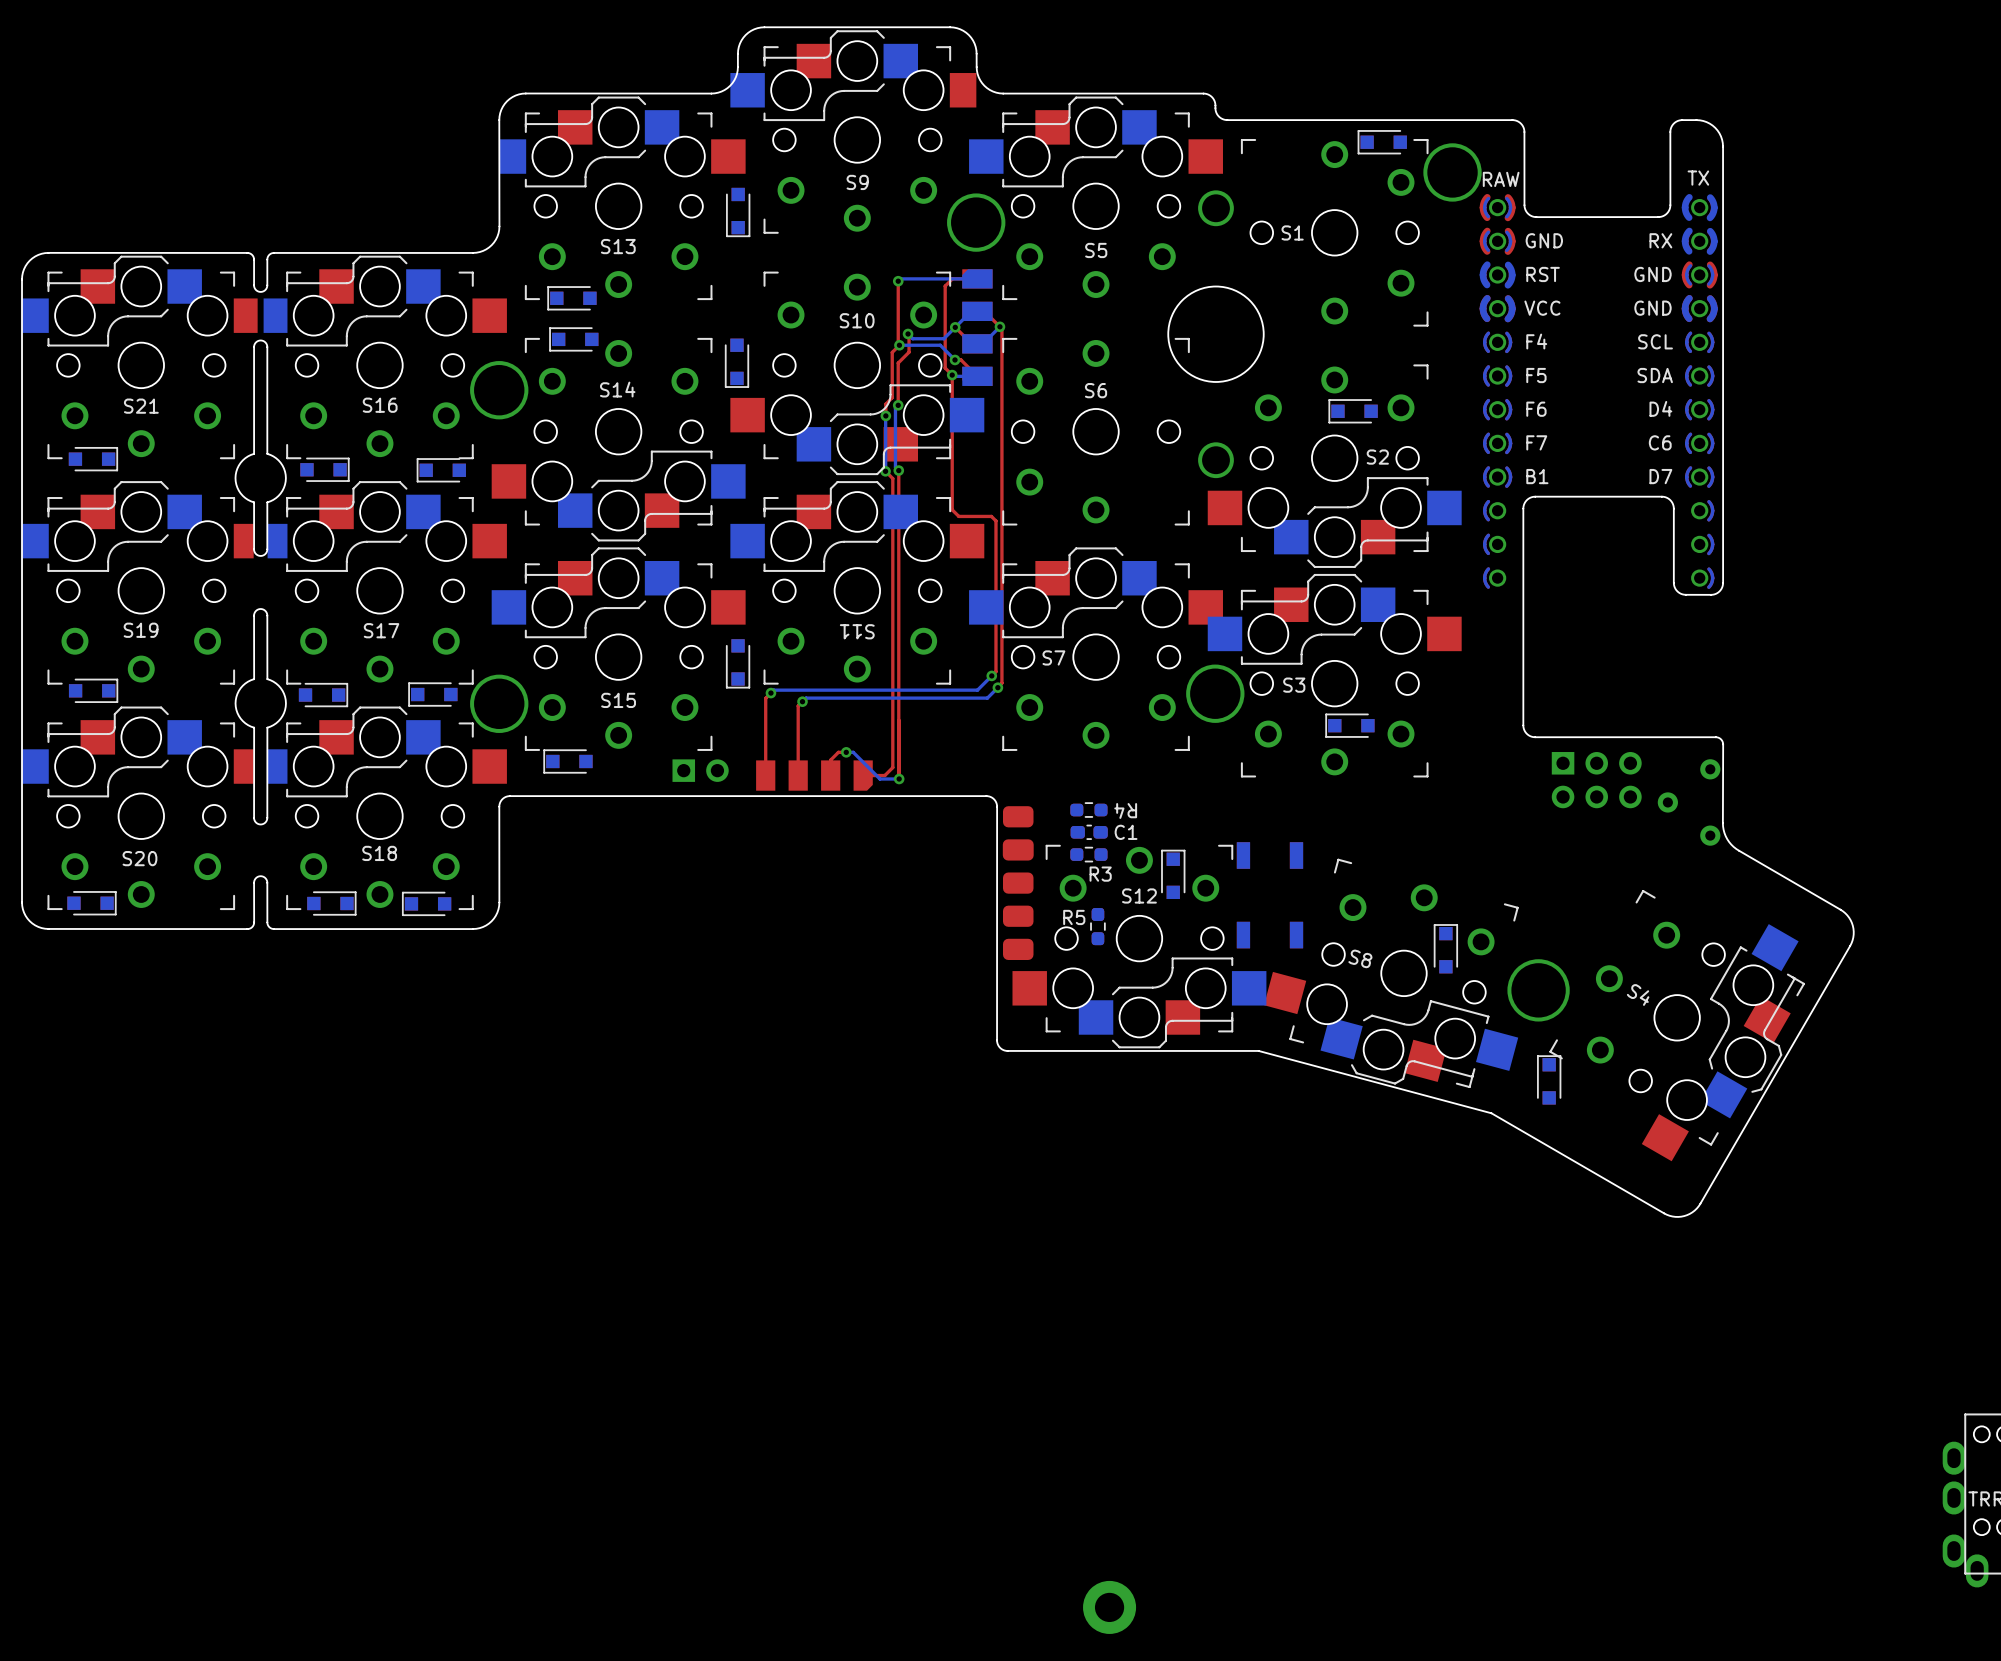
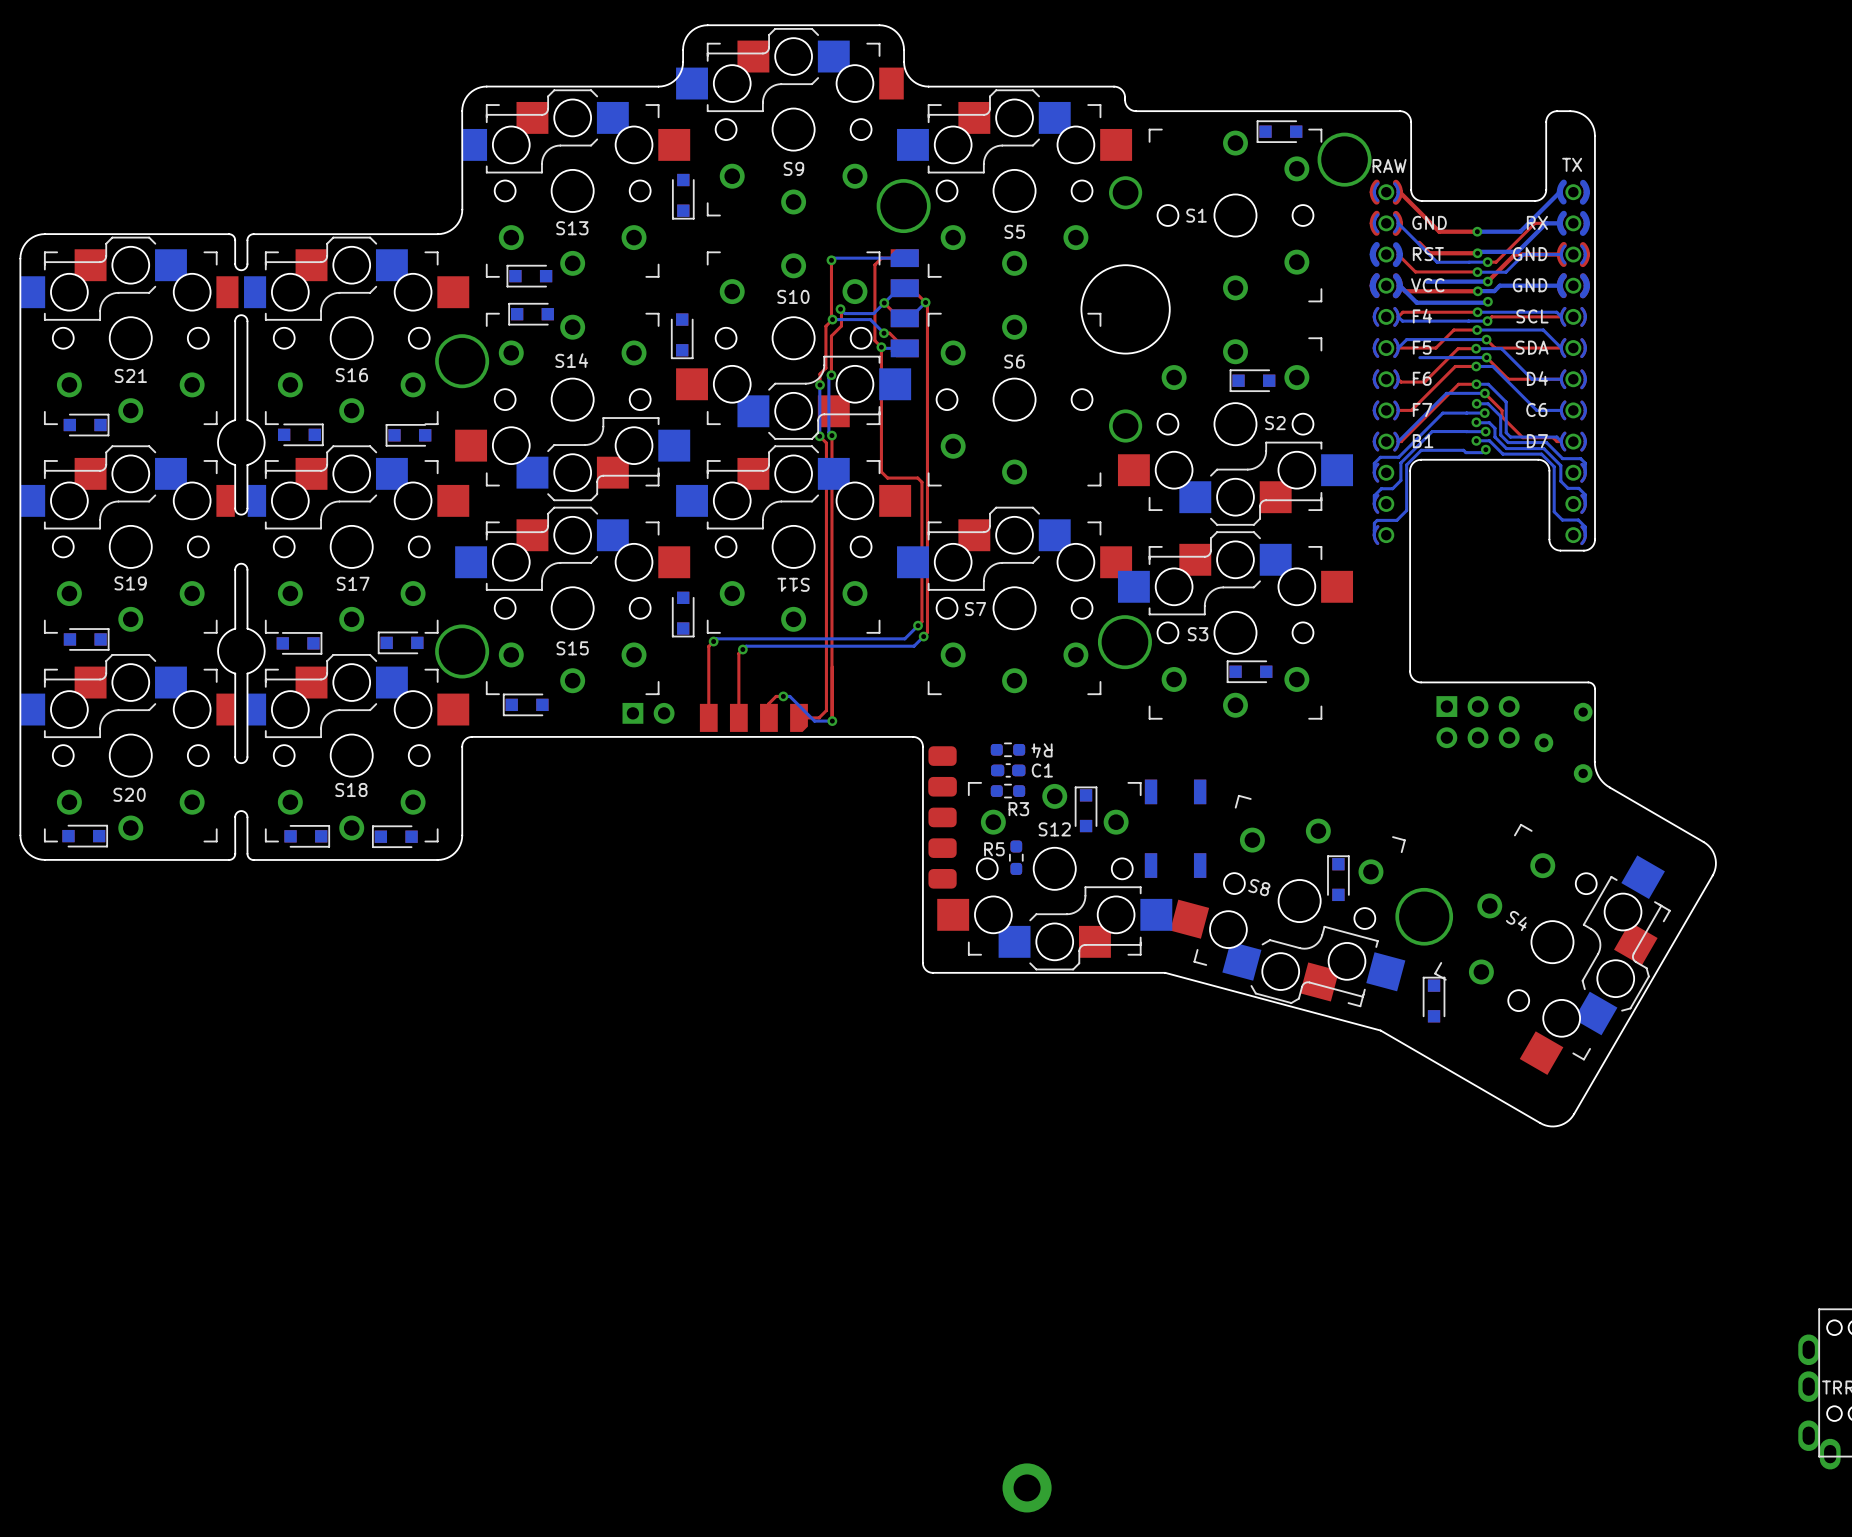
top track: none -> (1399, 192) (1439, 231) (1477, 231)
bottom track: none -> (1559, 192) (1520, 231) (1477, 231)
bottom track: none -> (1398, 223) (1437, 262) (1469, 262)
bottom track: none -> (1559, 223) (1546, 223) (1517, 251) (1477, 253)
top track: none -> (1561, 223) (1534, 223) (1496, 262) (1487, 262)
via: none -> (1477, 231)
top track: none -> (1419, 242) (1429, 253) (1477, 253)
via: none -> (1477, 253)
top track: none -> (1559, 254) (1514, 254) (1487, 281)
bottom track: none -> (1561, 254) (1523, 254) (1505, 272) (1477, 272)
top track: none -> (1398, 254) (1415, 271) (1477, 271)
bottom track: none -> (1469, 262) (1487, 262) (1486, 263)
via: none -> (1487, 262)
via: none -> (1477, 272)
bottom track: none -> (1487, 281) (1426, 281)
via: none -> (1487, 281)
top track: none -> (1399, 285) (1405, 291) (1477, 291)
bottom track: none -> (1399, 285) (1416, 302) (1487, 301)
bottom track: none -> (1559, 285) (1499, 285) (1494, 291) (1477, 291)
via: none -> (1477, 291)
via: none -> (1487, 301)
top track: none -> (1477, 312) (1402, 312) (1398, 316)
bottom track: none -> (1477, 312) (1556, 312) (1561, 316)
via: none -> (1477, 312)
bottom track: none -> (1398, 316) (1402, 321) (1487, 321)
top track: none -> (1561, 316) (1491, 316) (1487, 321)
via: none -> (1487, 321)
top track: none -> (1477, 330) (1453, 330) (1435, 348) (1398, 348)
bottom track: none -> (1477, 330) (1543, 330) (1561, 348)
via: none -> (1477, 330)
top track: none -> (1486, 339) (1495, 348) (1561, 348)
bottom track: none -> (1486, 339) (1406, 339) (1398, 348)
via: none -> (1486, 339)
top track: none -> (1476, 348) (1458, 348) (1424, 382) (1401, 382) (1398, 379)
bottom track: none -> (1476, 348) (1501, 348) (1532, 379) (1561, 379)
via: none -> (1476, 348)
top track: none -> (1486, 357) (1508, 379) (1561, 379)
bottom track: none -> (1486, 357) (1419, 357)
via: none -> (1486, 357)
top track: none -> (1476, 366) (1455, 366) (1411, 410) (1398, 410)
bottom track: none -> (1476, 366) (1492, 366) (1536, 410) (1561, 410)
via: none -> (1476, 366)
top track: none -> (1476, 384) (1458, 384) (1401, 441) (1398, 441)
bottom track: none -> (1476, 384) (1488, 384) (1506, 402) (1506, 432) (1510, 437) (1556, 437) (1561, 441)
via: none -> (1476, 384)
top track: none -> (1484, 393) (1502, 410) (1502, 416) (1522, 437) (1553, 437) (1557, 441) (1561, 441)
bottom track: none -> (1484, 393) (1446, 393) (1398, 441)
via: none -> (1484, 393)
bottom track: none -> (1476, 403) (1488, 403) (1500, 416) (1500, 435) (1508, 442) (1546, 442) (1562, 458) (1580, 458) (1585, 463) (1585, 472)
via: none -> (1476, 403)
bottom track: none -> (1484, 413) (1442, 413) (1398, 457) (1380, 457) (1374, 463) (1374, 472)
via: none -> (1484, 413)
bottom track: none -> (1476, 422) (1489, 422) (1494, 428) (1494, 437) (1506, 448) (1543, 448) (1560, 465) (1560, 481) (1567, 488) (1578, 488) (1585, 494) (1585, 503)
via: none -> (1476, 422)
bottom track: none -> (1466, 431) (1432, 431) (1400, 462) (1400, 480) (1392, 488) (1381, 488) (1374, 495) (1374, 503)
bottom track: none -> (1485, 431) (1466, 431)
via: none -> (1485, 431)
via: none -> (1476, 440)
bottom track: none -> (1476, 440) (1489, 440) (1502, 454) (1541, 454) (1554, 466) (1554, 511) (1562, 520) (1578, 520) (1585, 526) (1585, 535)
bottom track: none -> (1485, 449) (1482, 452) (1465, 452) (1463, 450) (1421, 450) (1406, 464) (1406, 510) (1396, 520) (1377, 520) (1374, 523) (1374, 530)
via: none -> (1485, 449)

